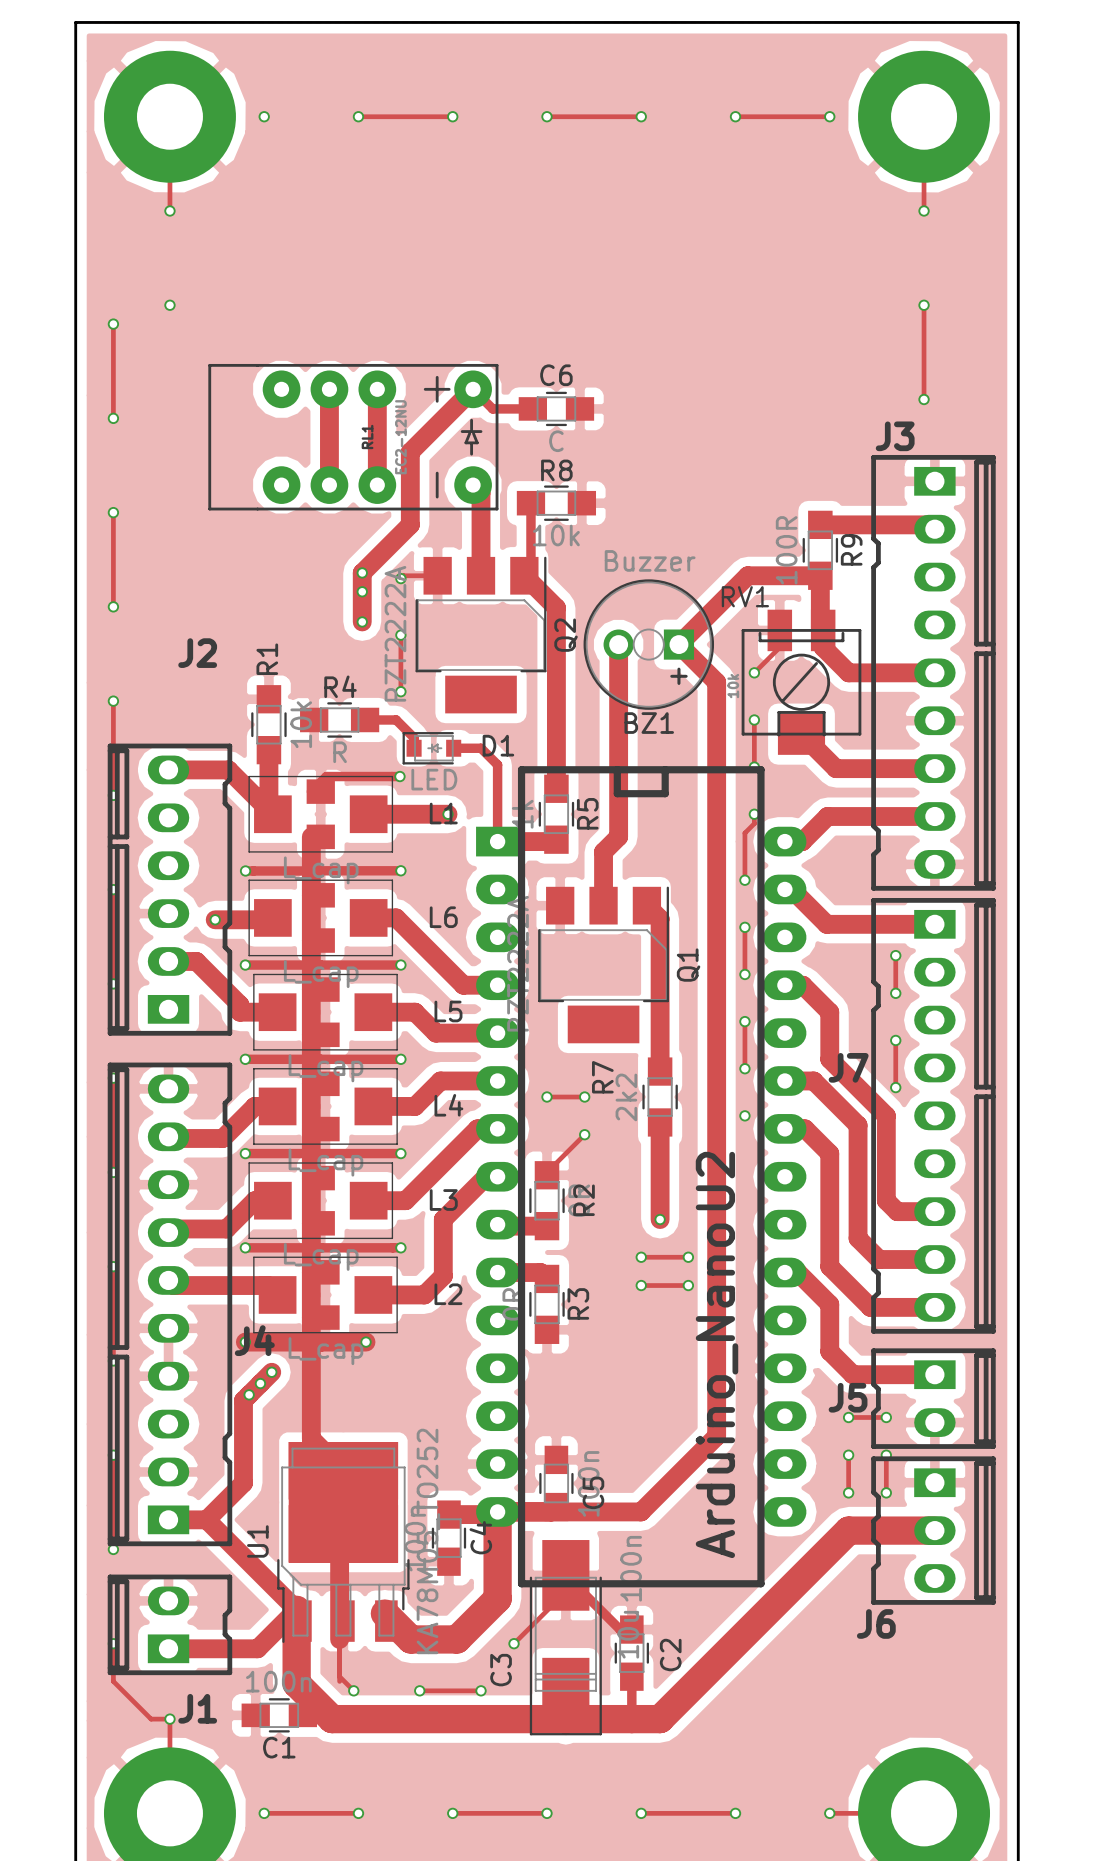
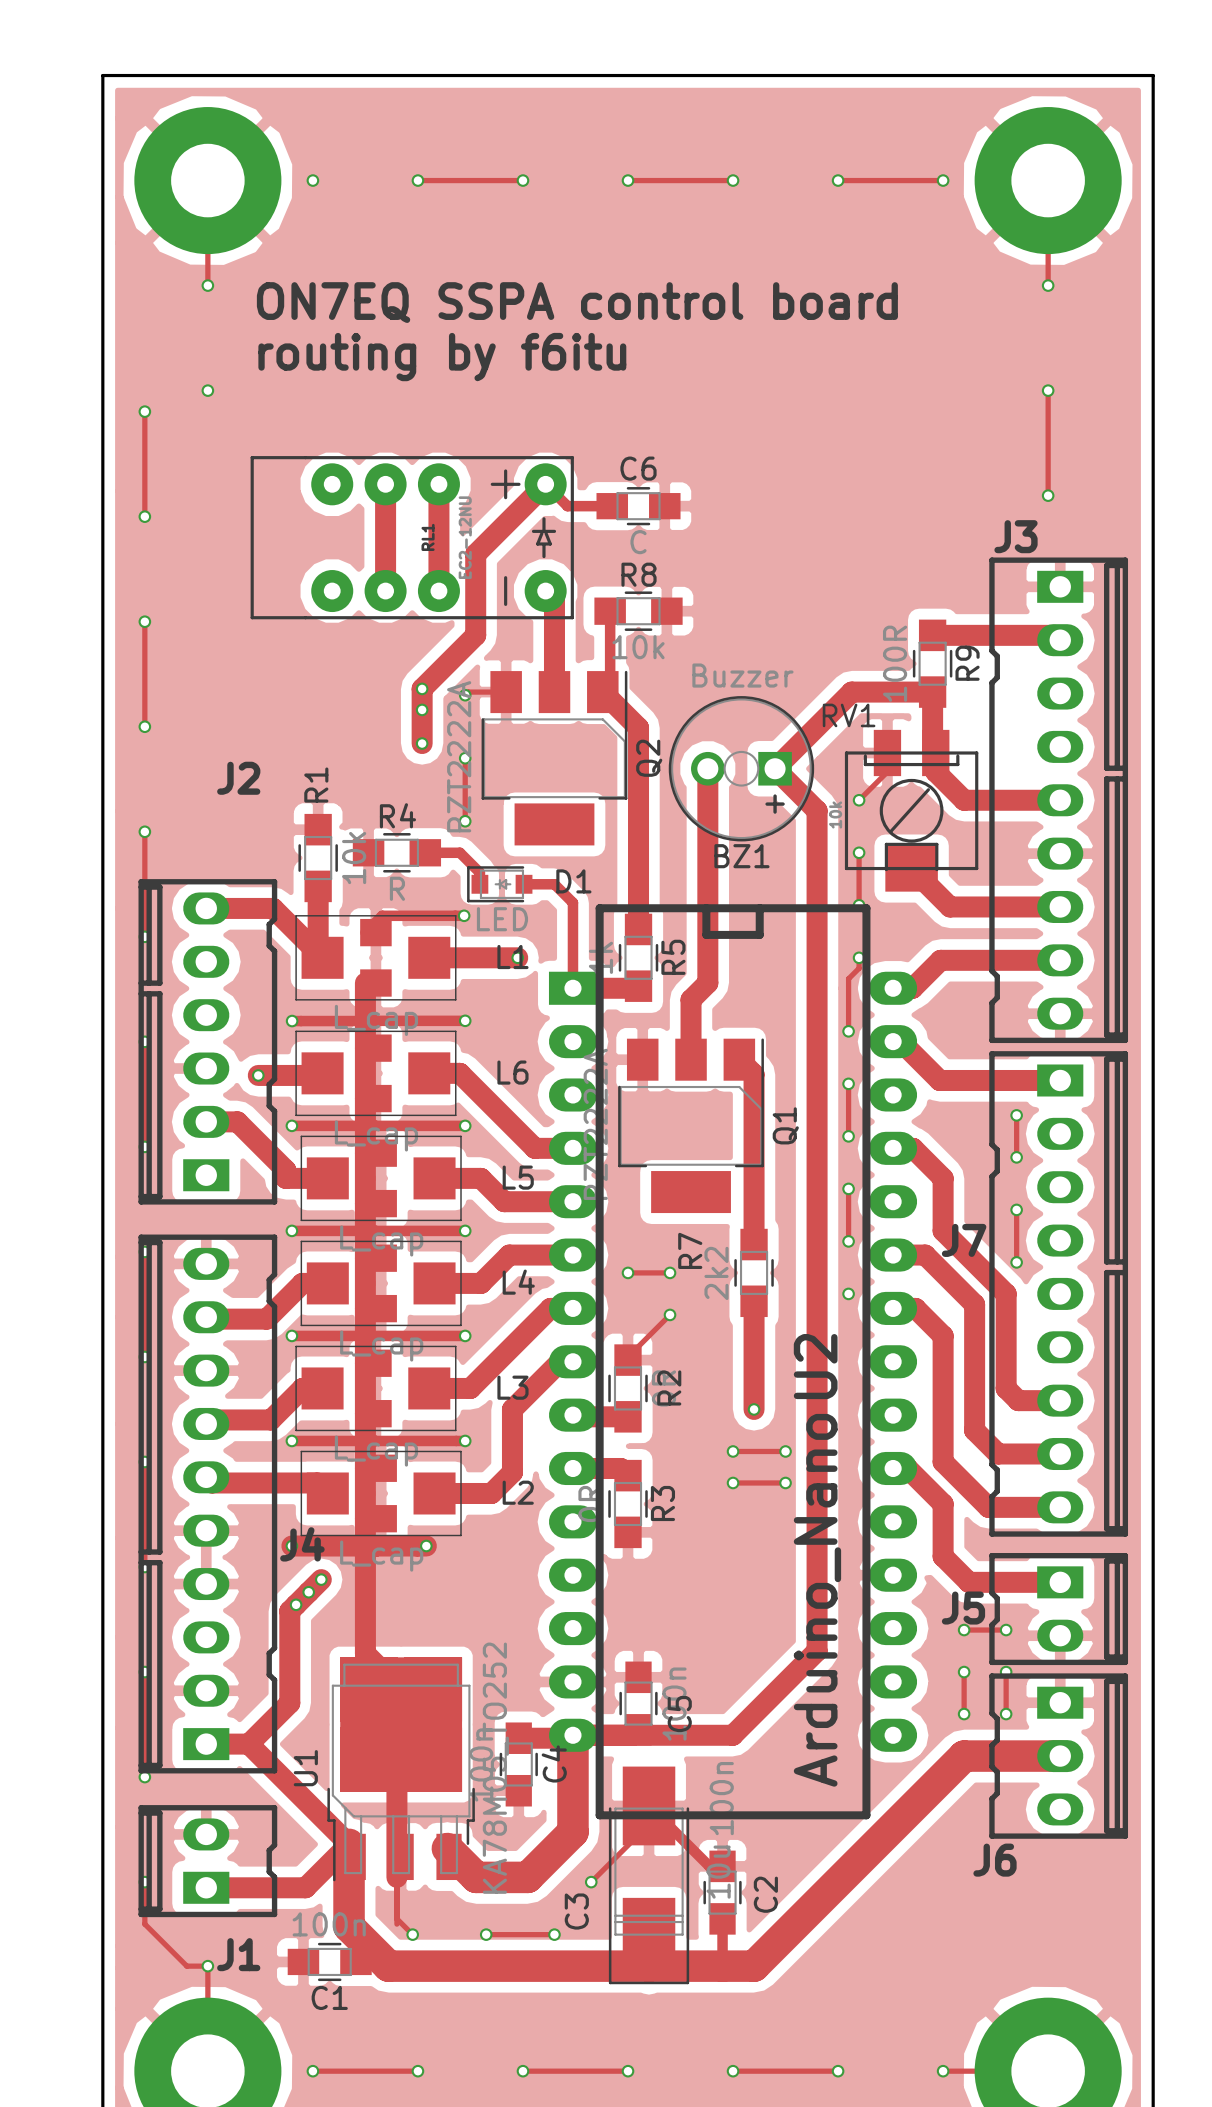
text: none -> ON7EQ SSPA control board (577, 302)
text: none -> routing by f6itu (442, 357)

